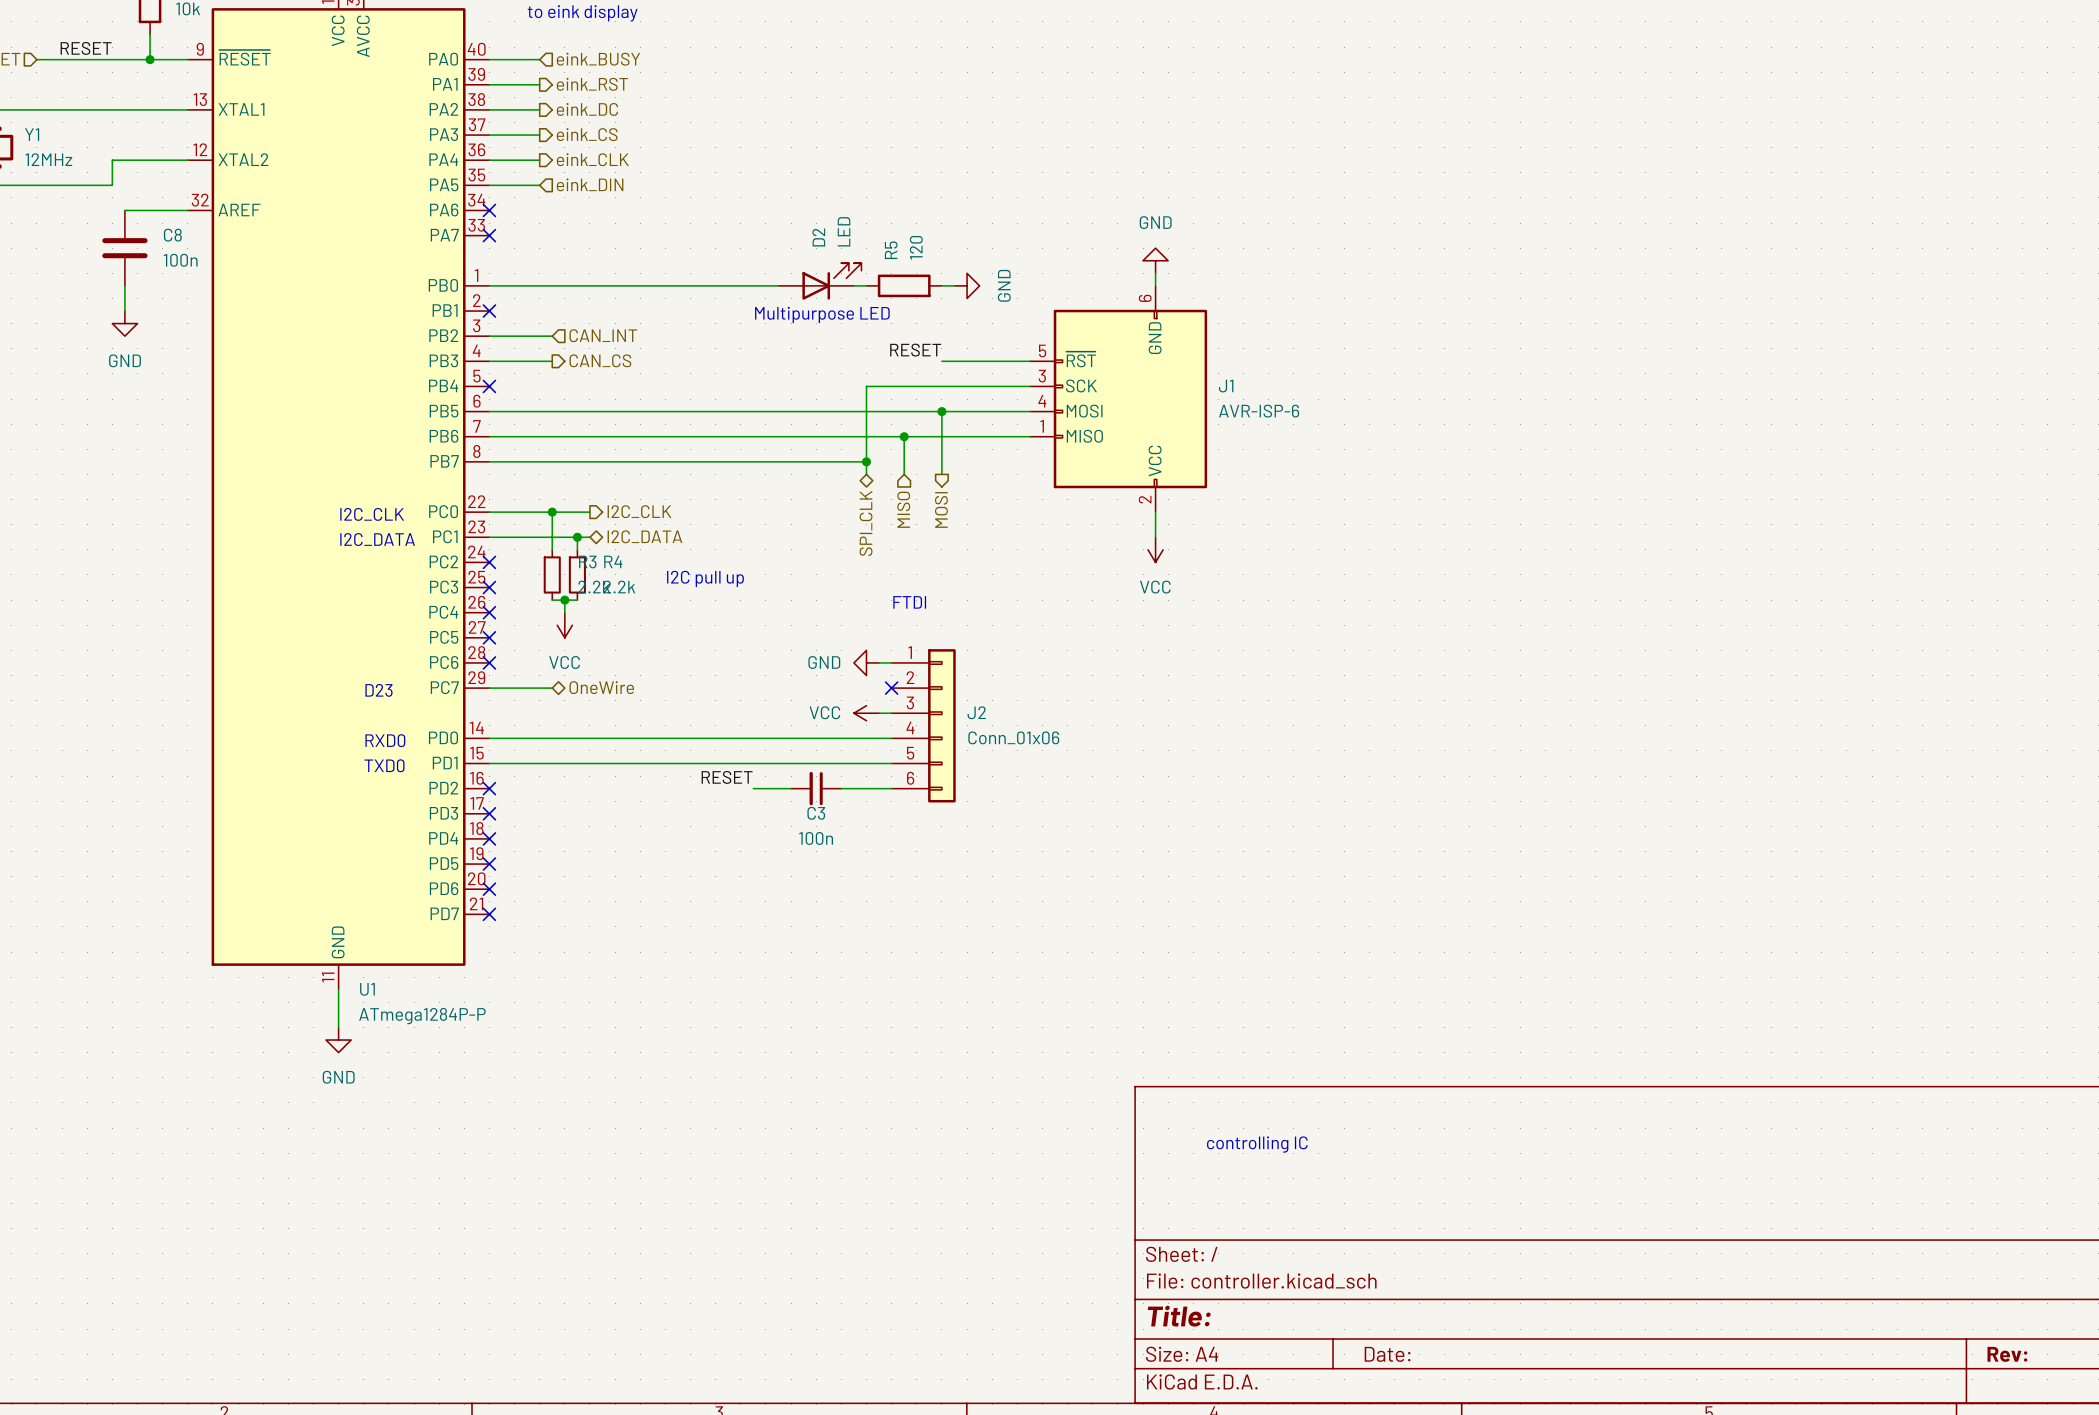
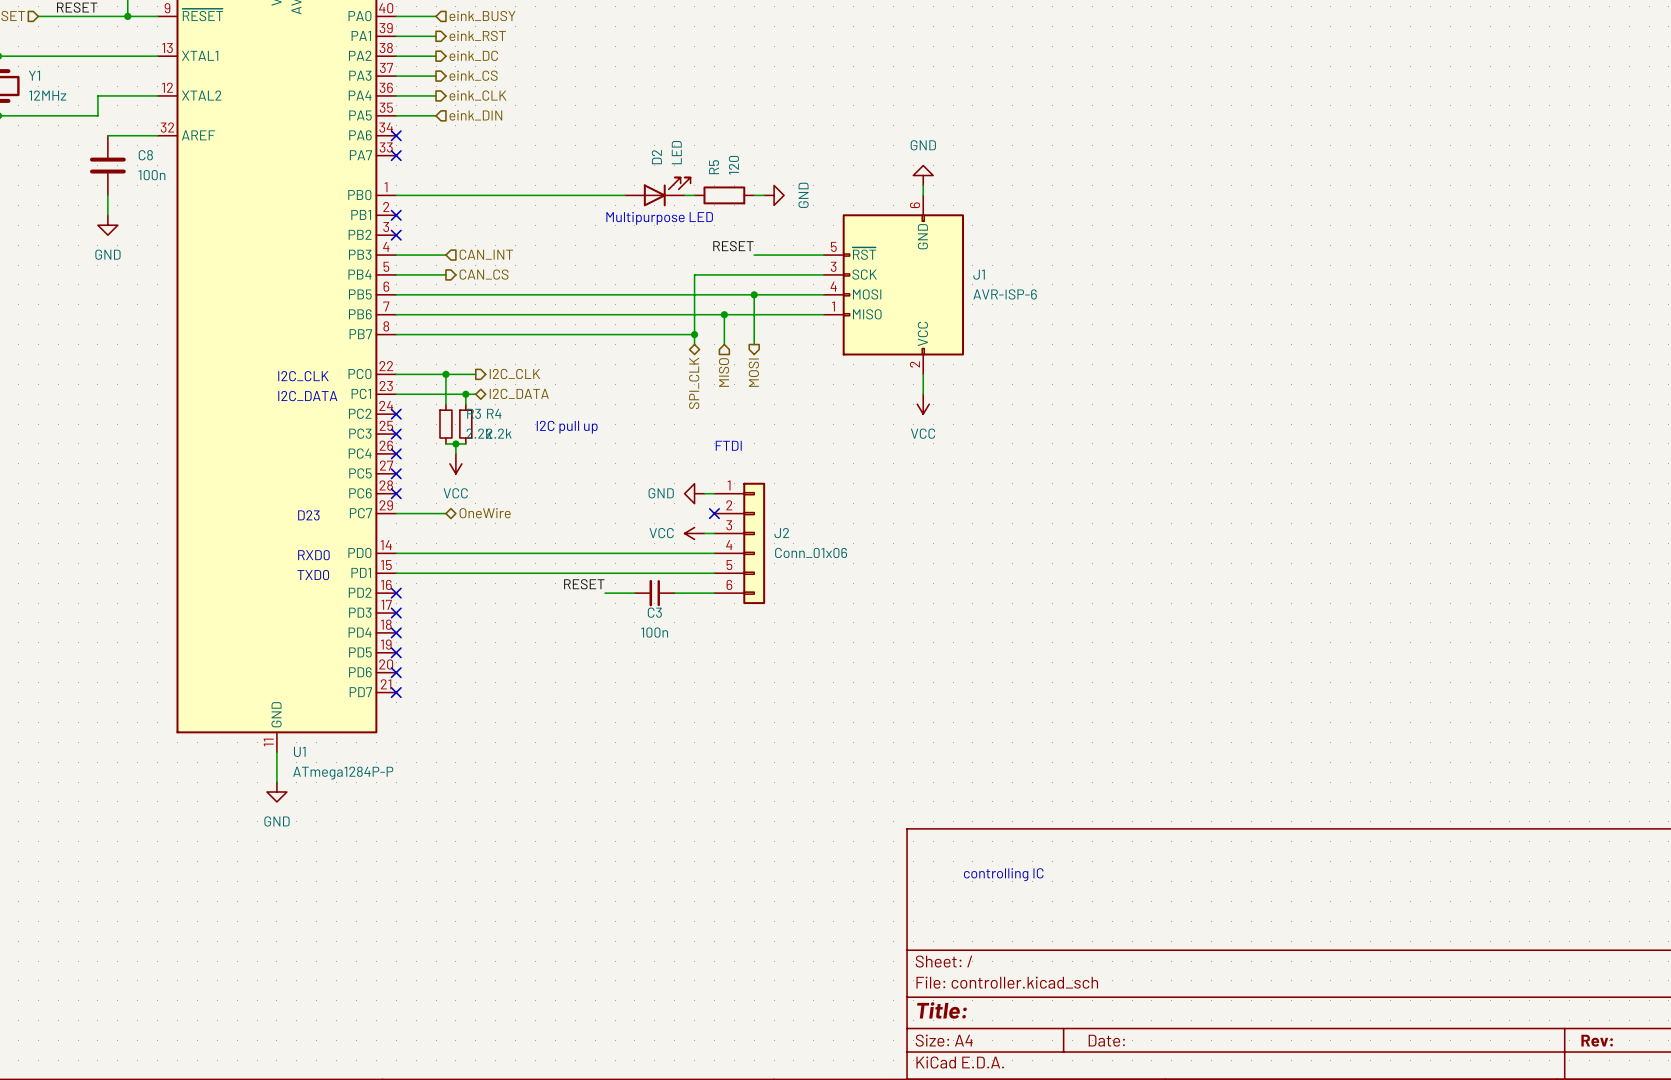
hierarchical label: CAN_INT (603, 335) -> none
wire: (489, 336) (552, 336) -> (396, 274) (445, 274)
hierarchical label shape: output (600, 360) -> input (486, 254)
hierarchical label: CAN_CS (600, 360) -> CAN_INT (486, 254)
hierarchical label: none -> CAN_CS (484, 274)
no-connect mark position: (489, 386) -> (396, 235)

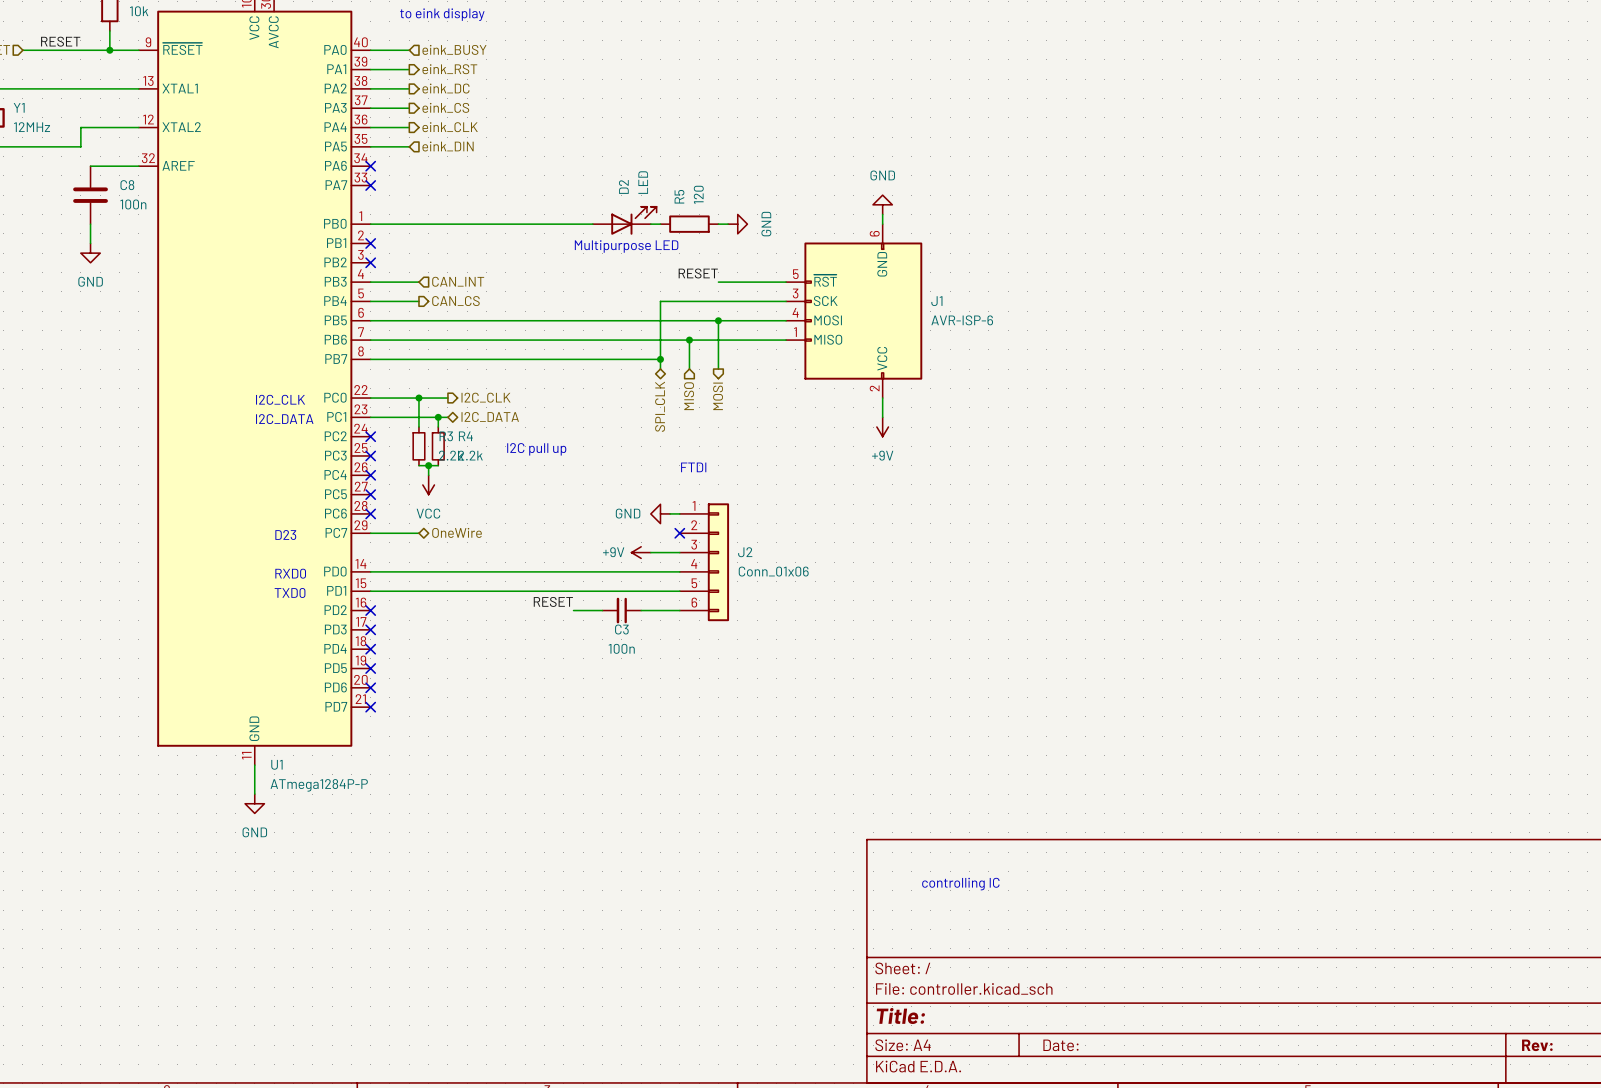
power symbol: VCC (923, 404) -> +9V (882, 427)
power symbol: none -> +9V (641, 552)
power symbol: VCC (694, 533) -> none

